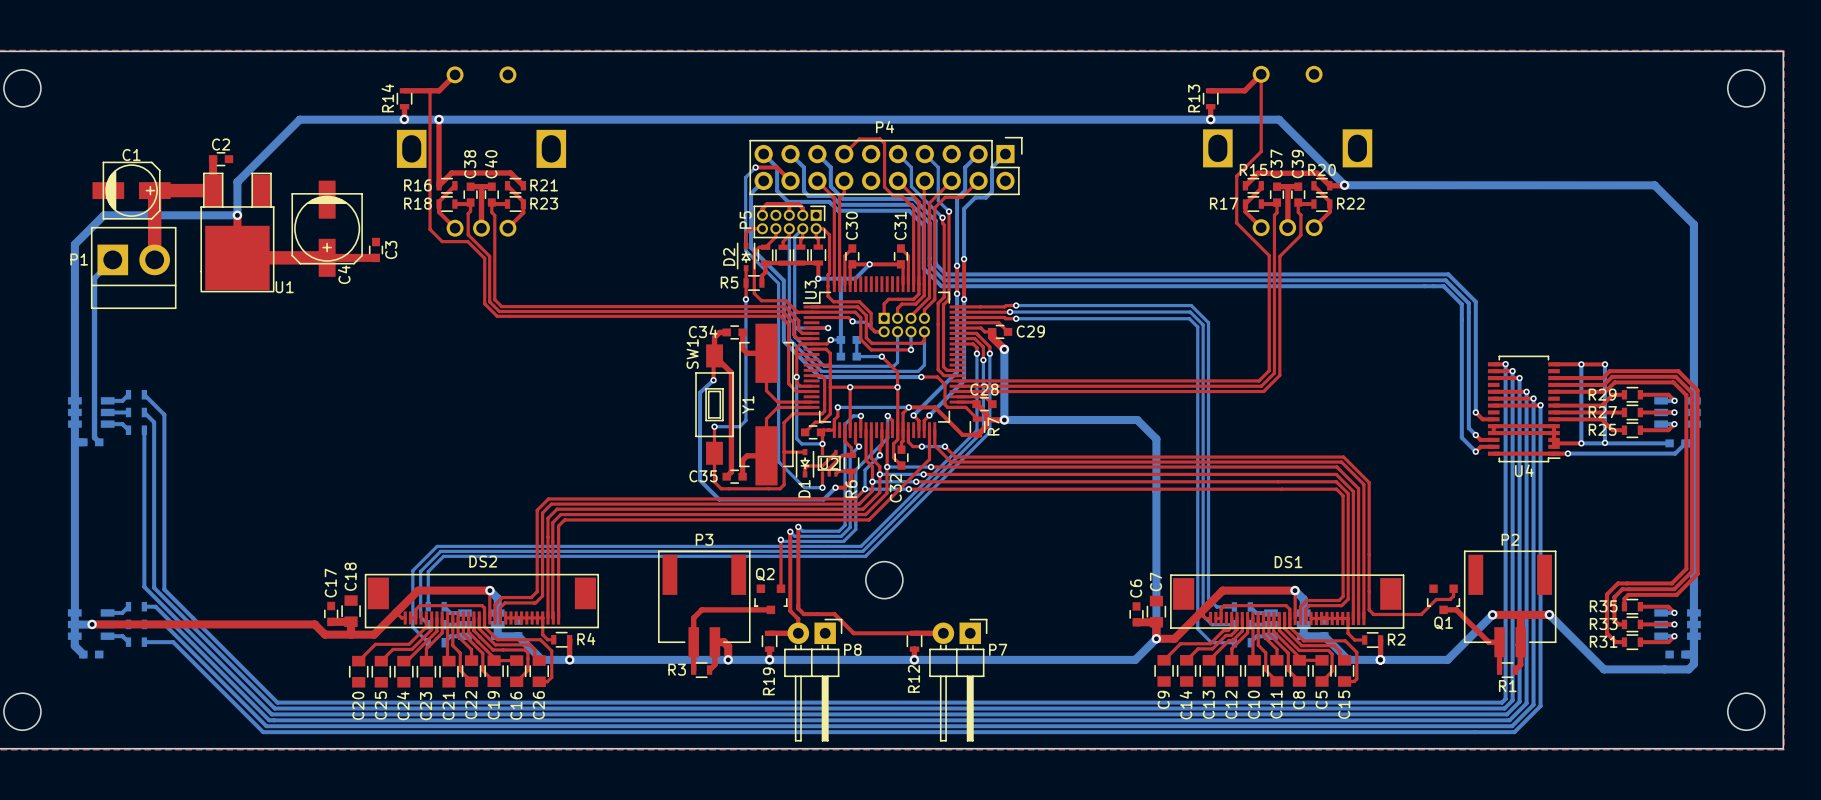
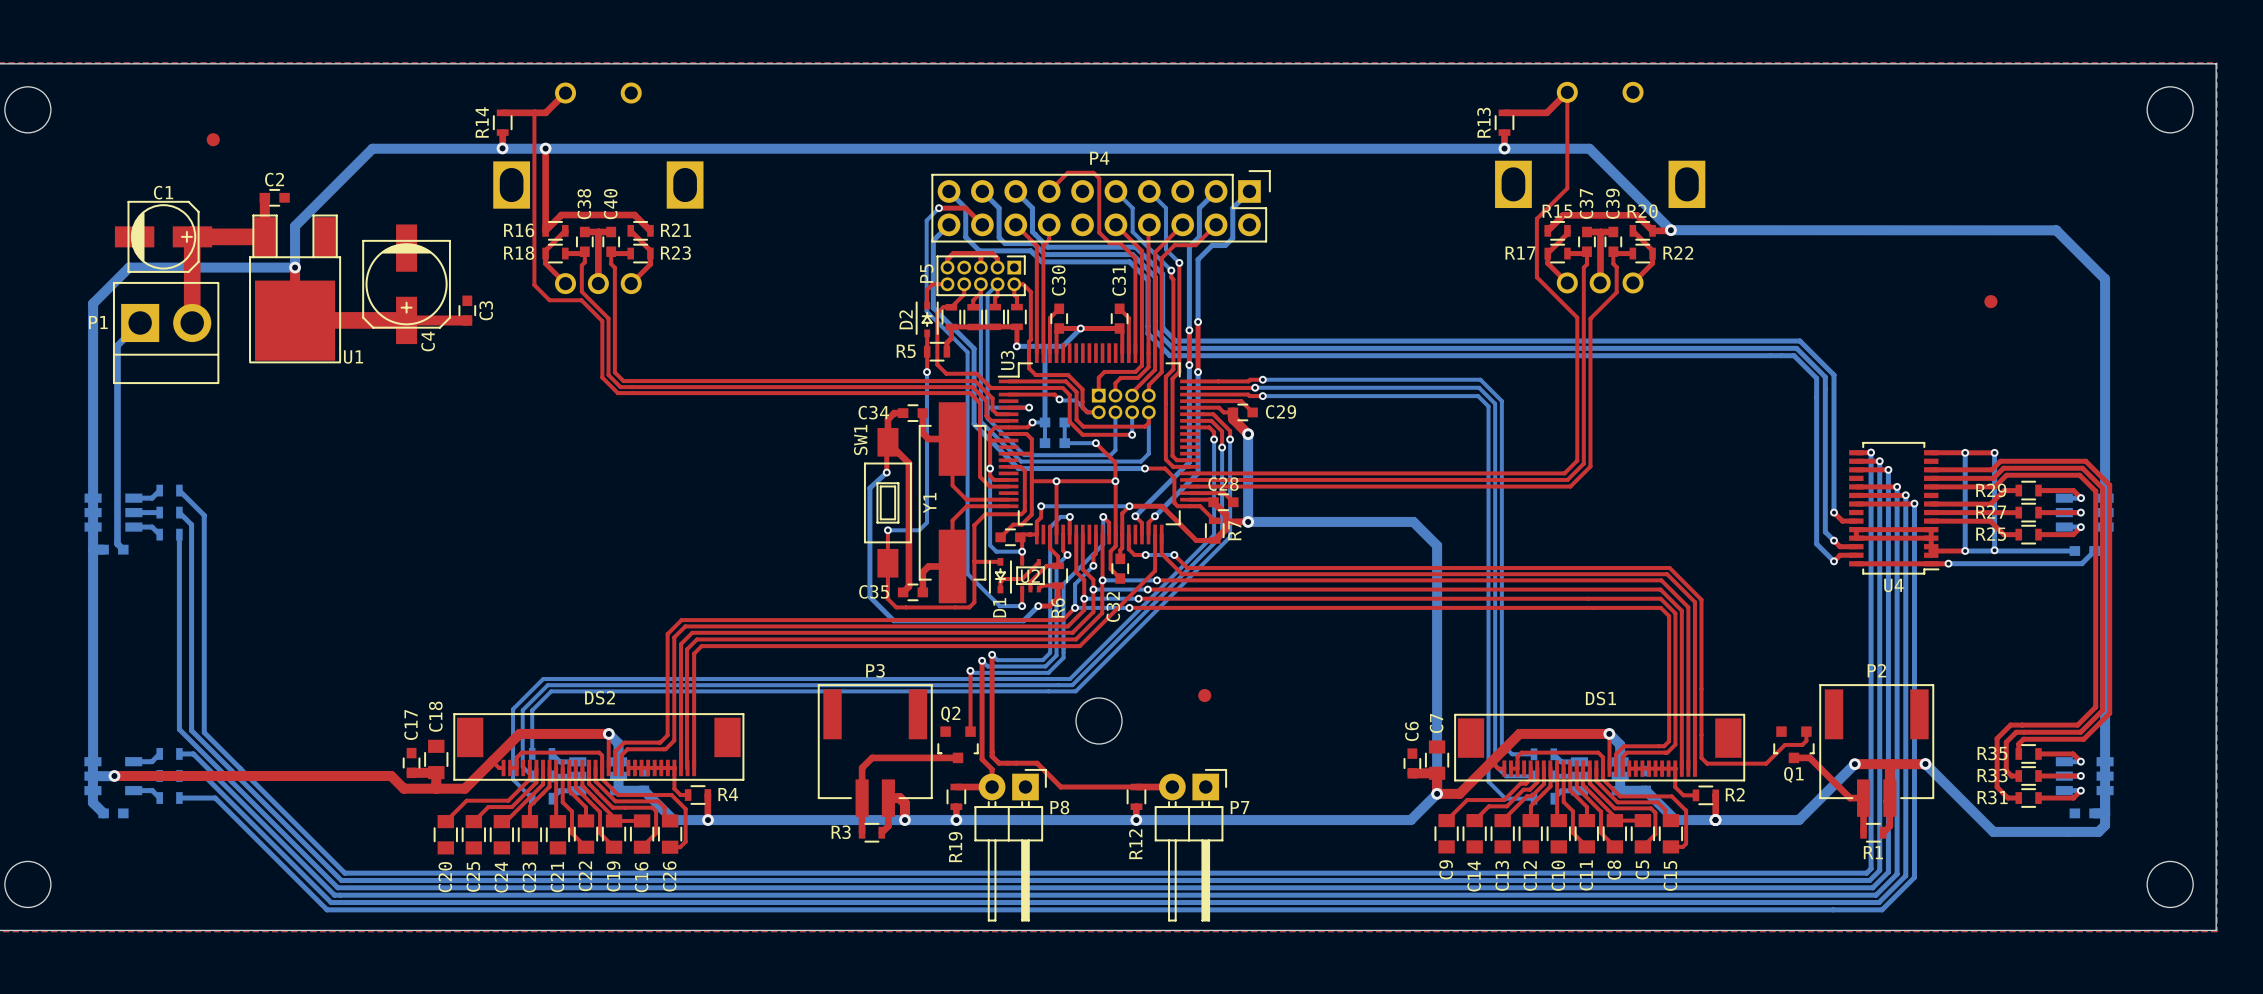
part: none -> (213, 139)
part: none -> (1990, 301)
part: none -> (1204, 695)

